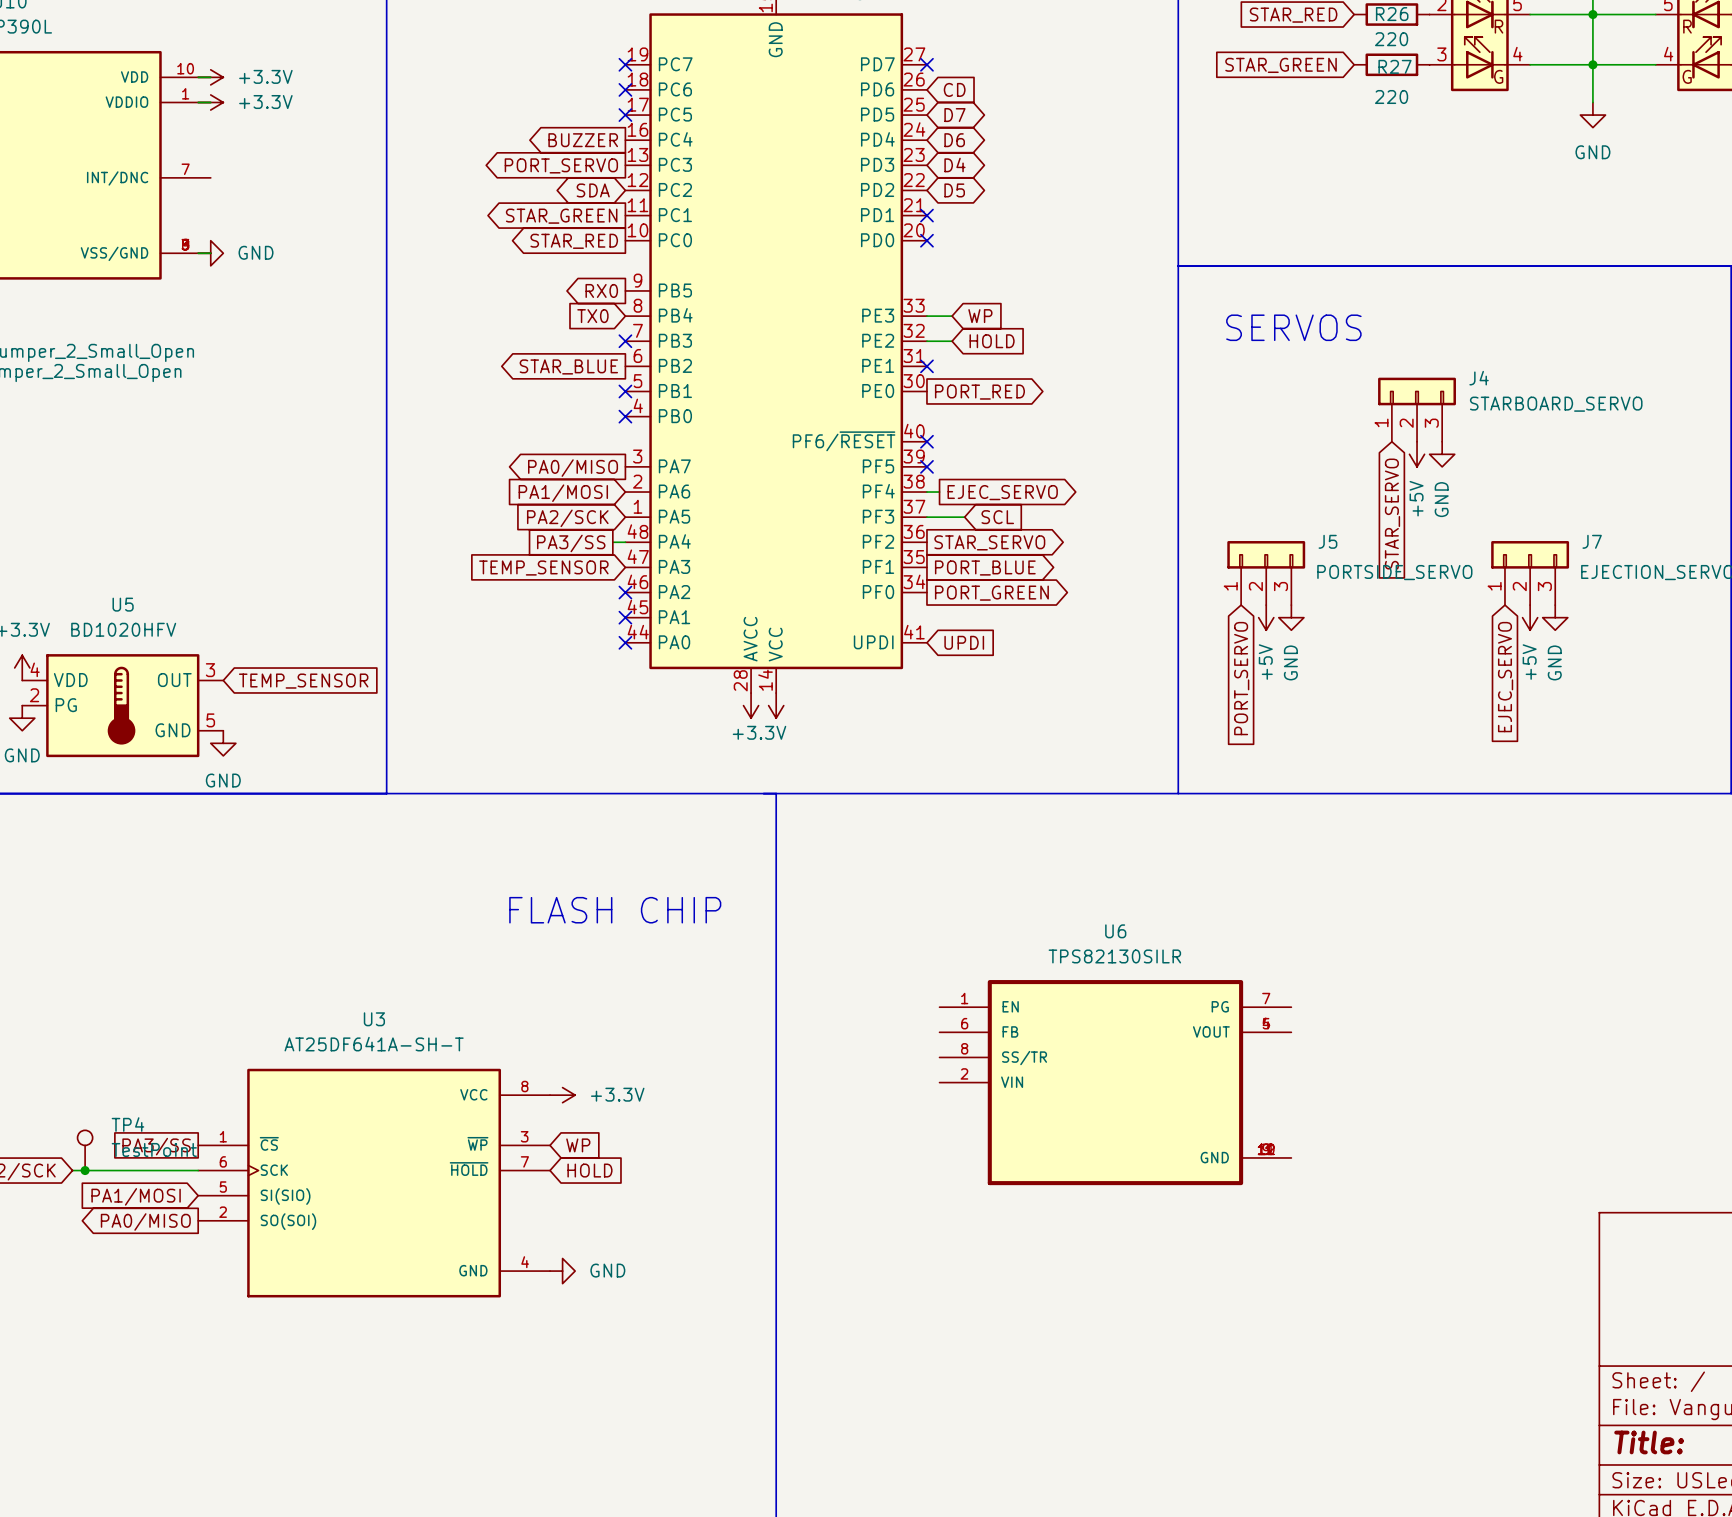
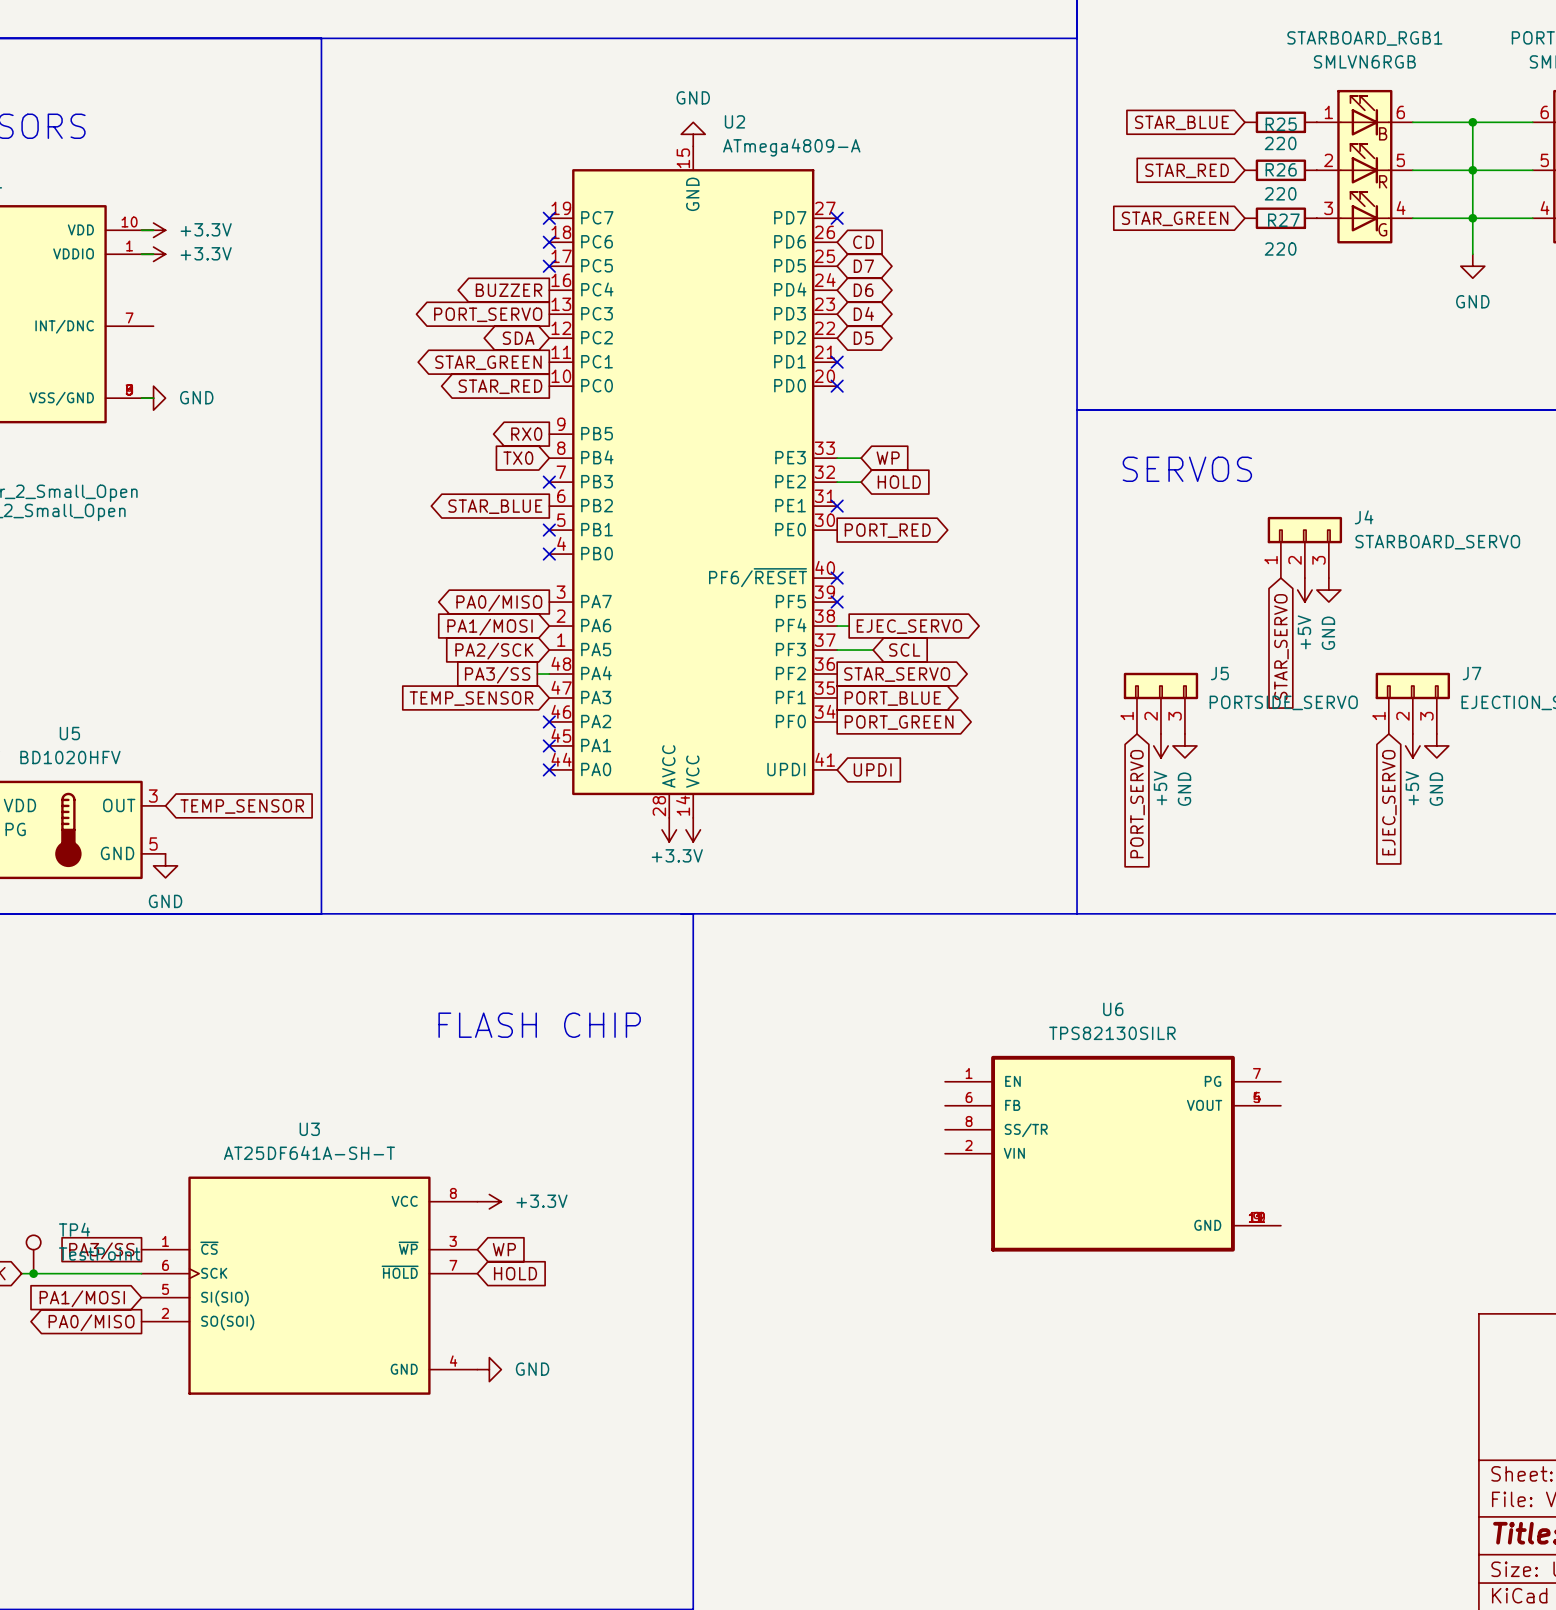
U6 position: (1115, 1082) -> (1113, 1153)

